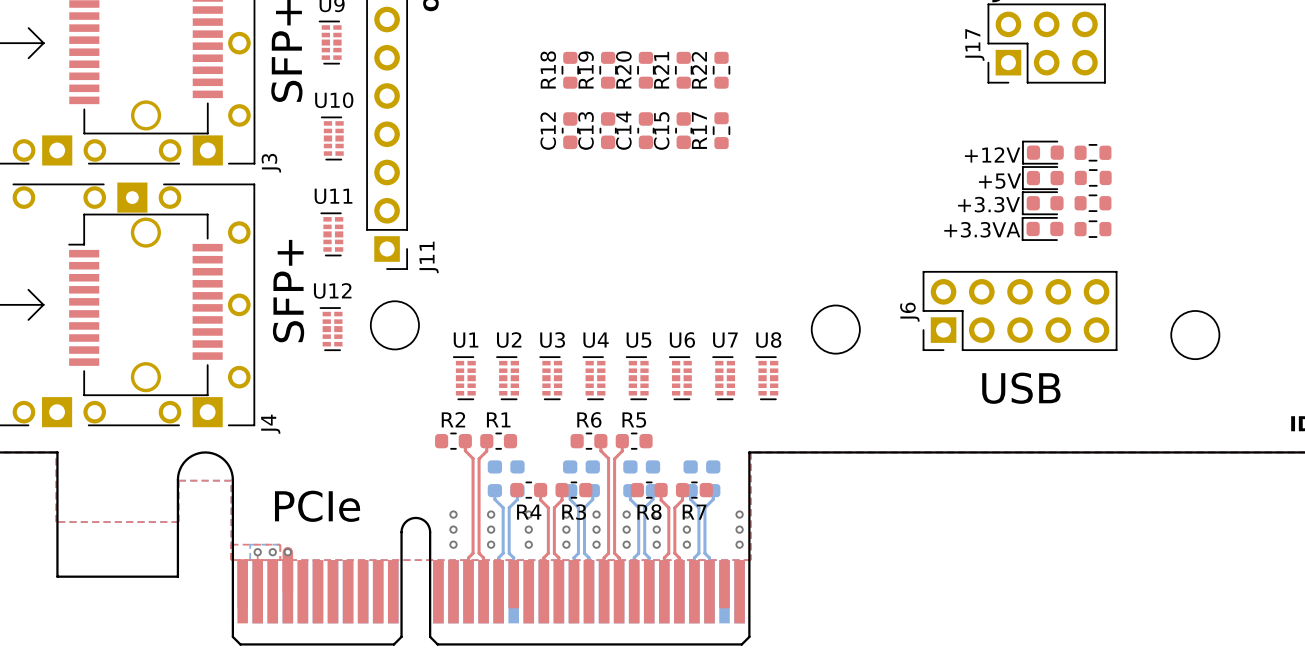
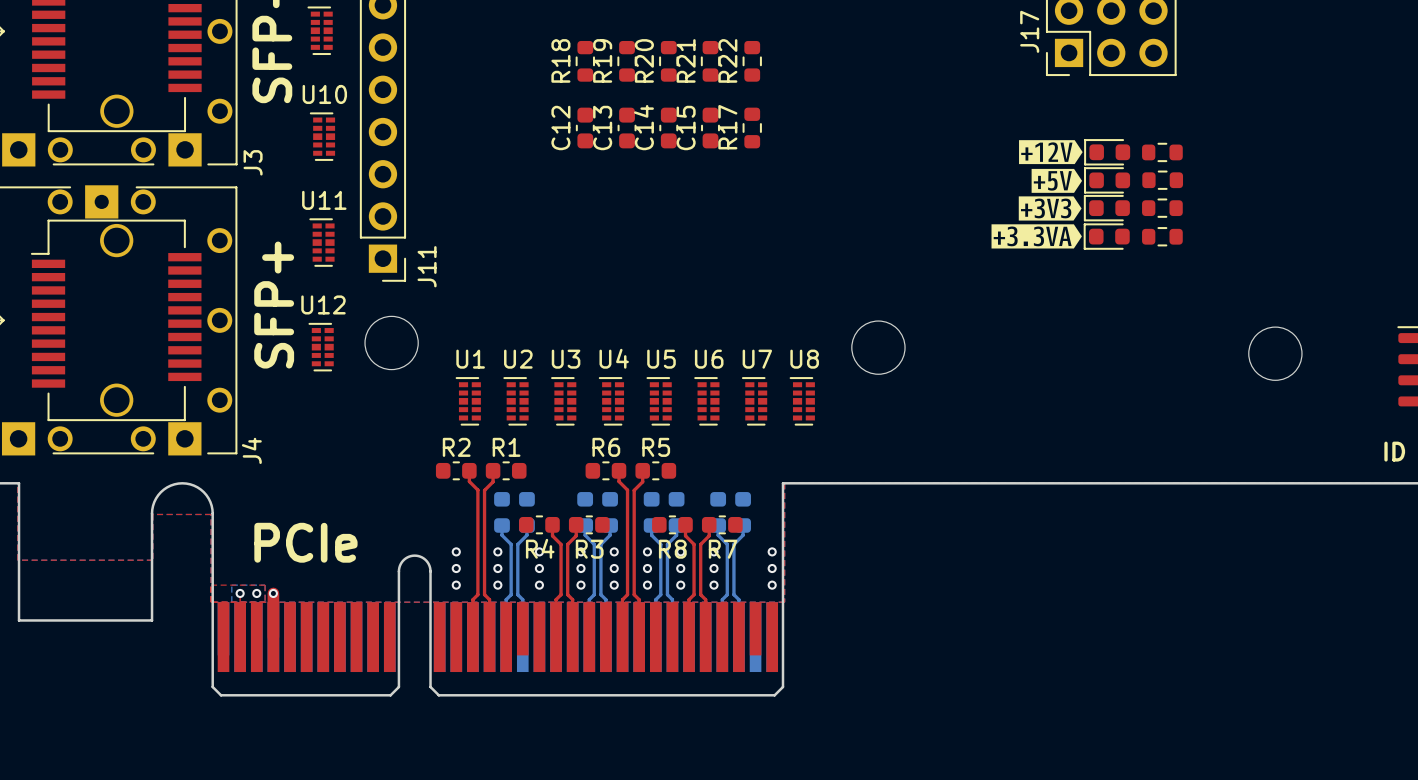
drawing: none -> [991, 140, 1083, 249]
part value: +12V (992, 154) -> none
part value: +5V (1000, 181) -> none
part value: +3.3V (989, 204) -> none
part value: +3.3VA (982, 229) -> none
J6: (1020, 310) -> none
text: USB (1021, 388) -> none

